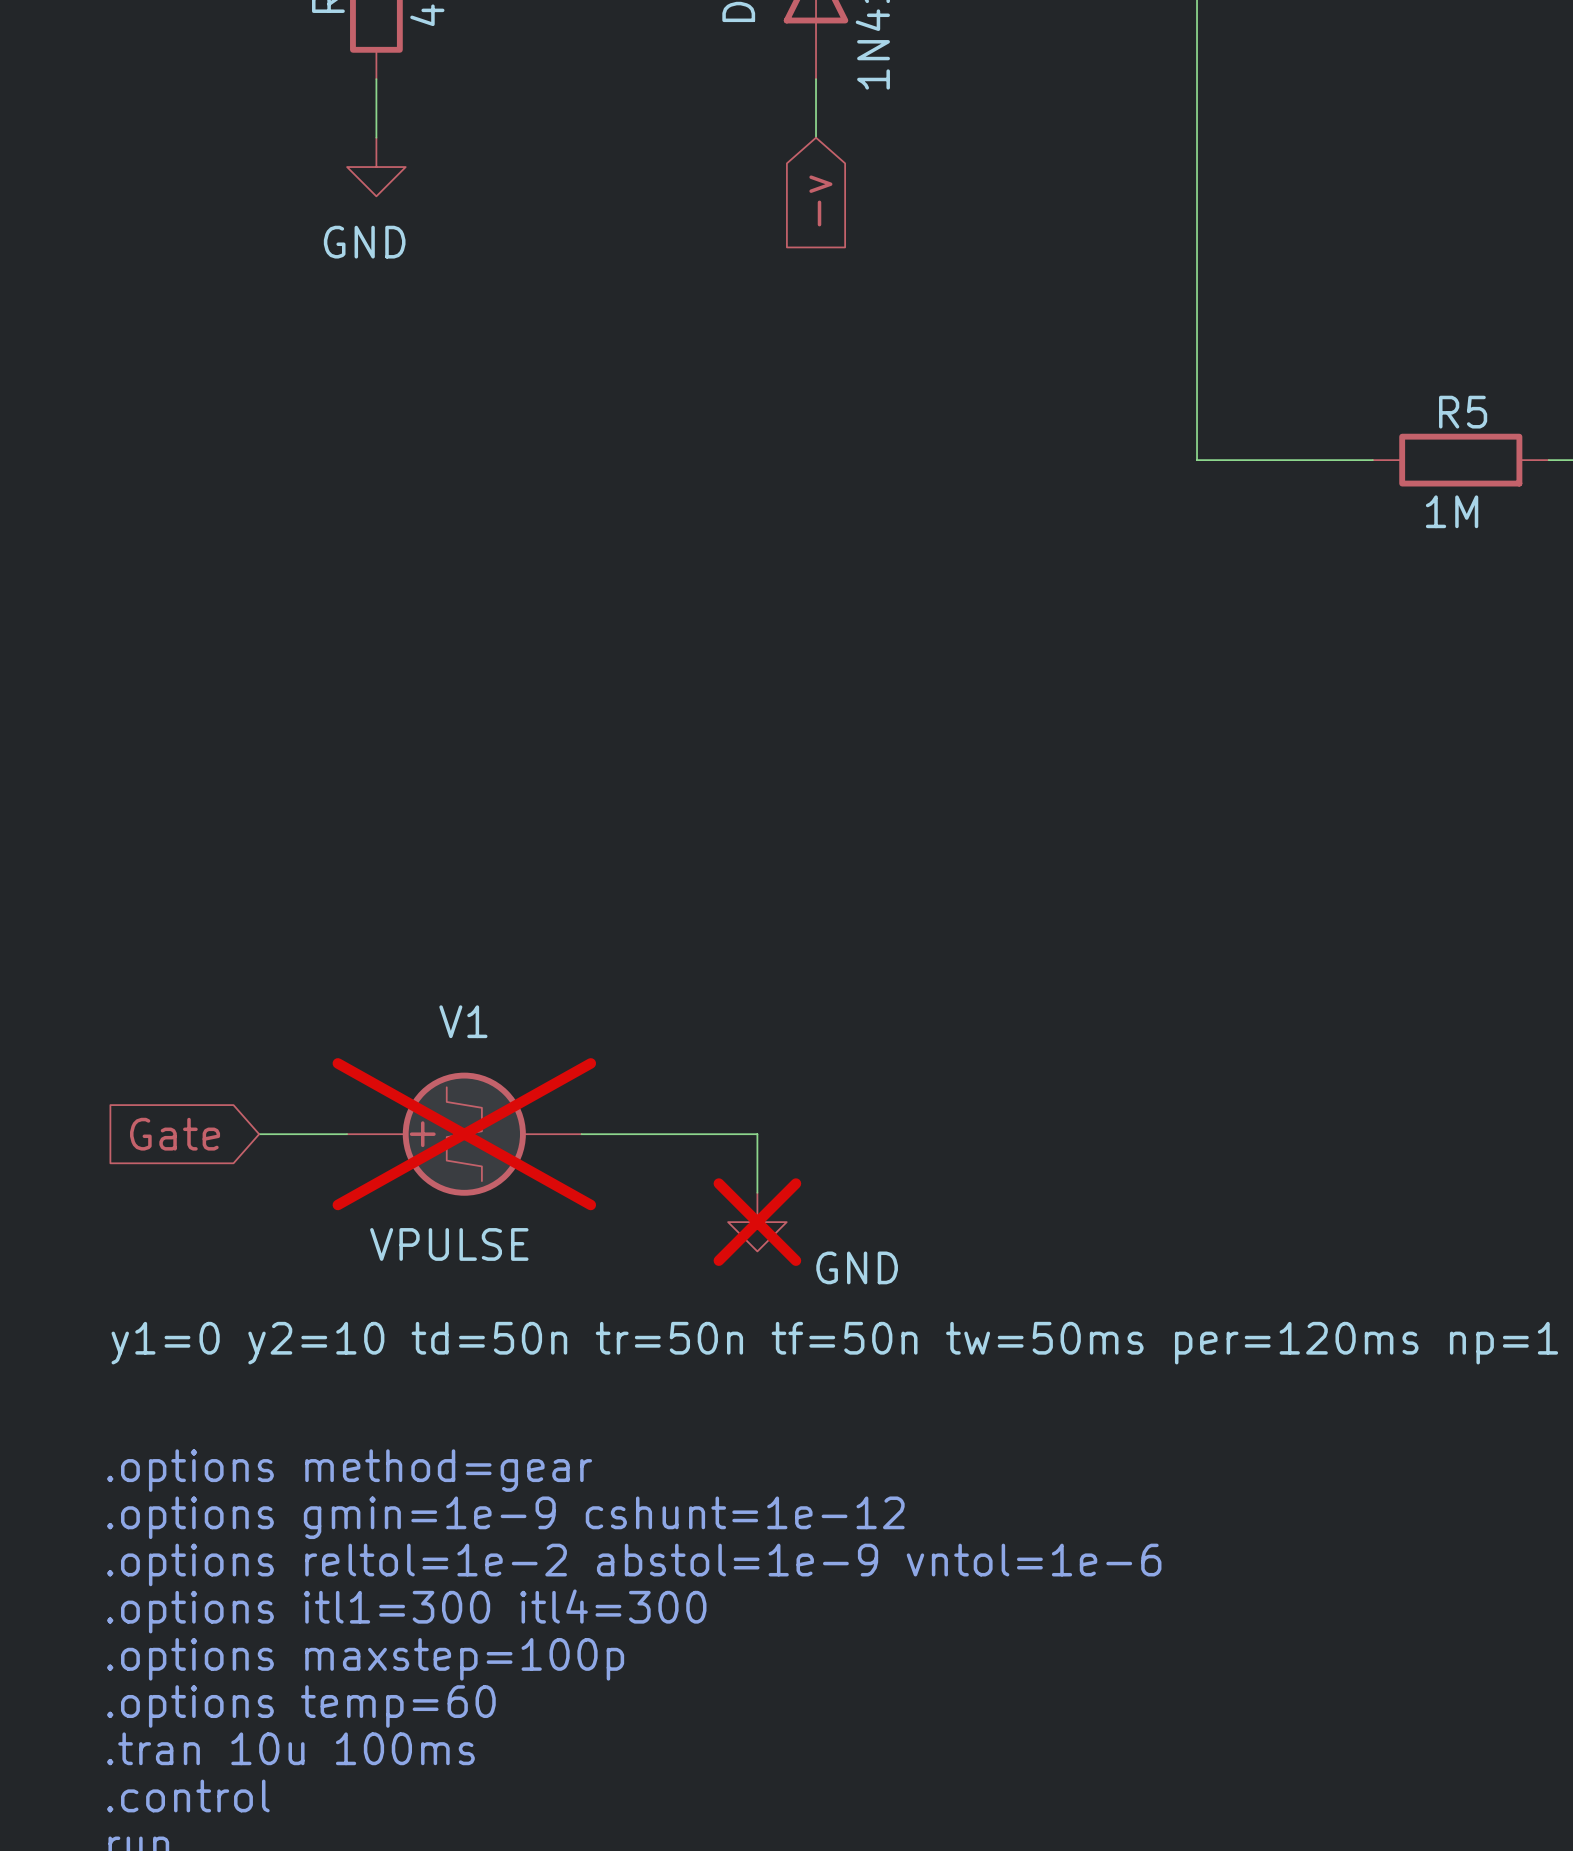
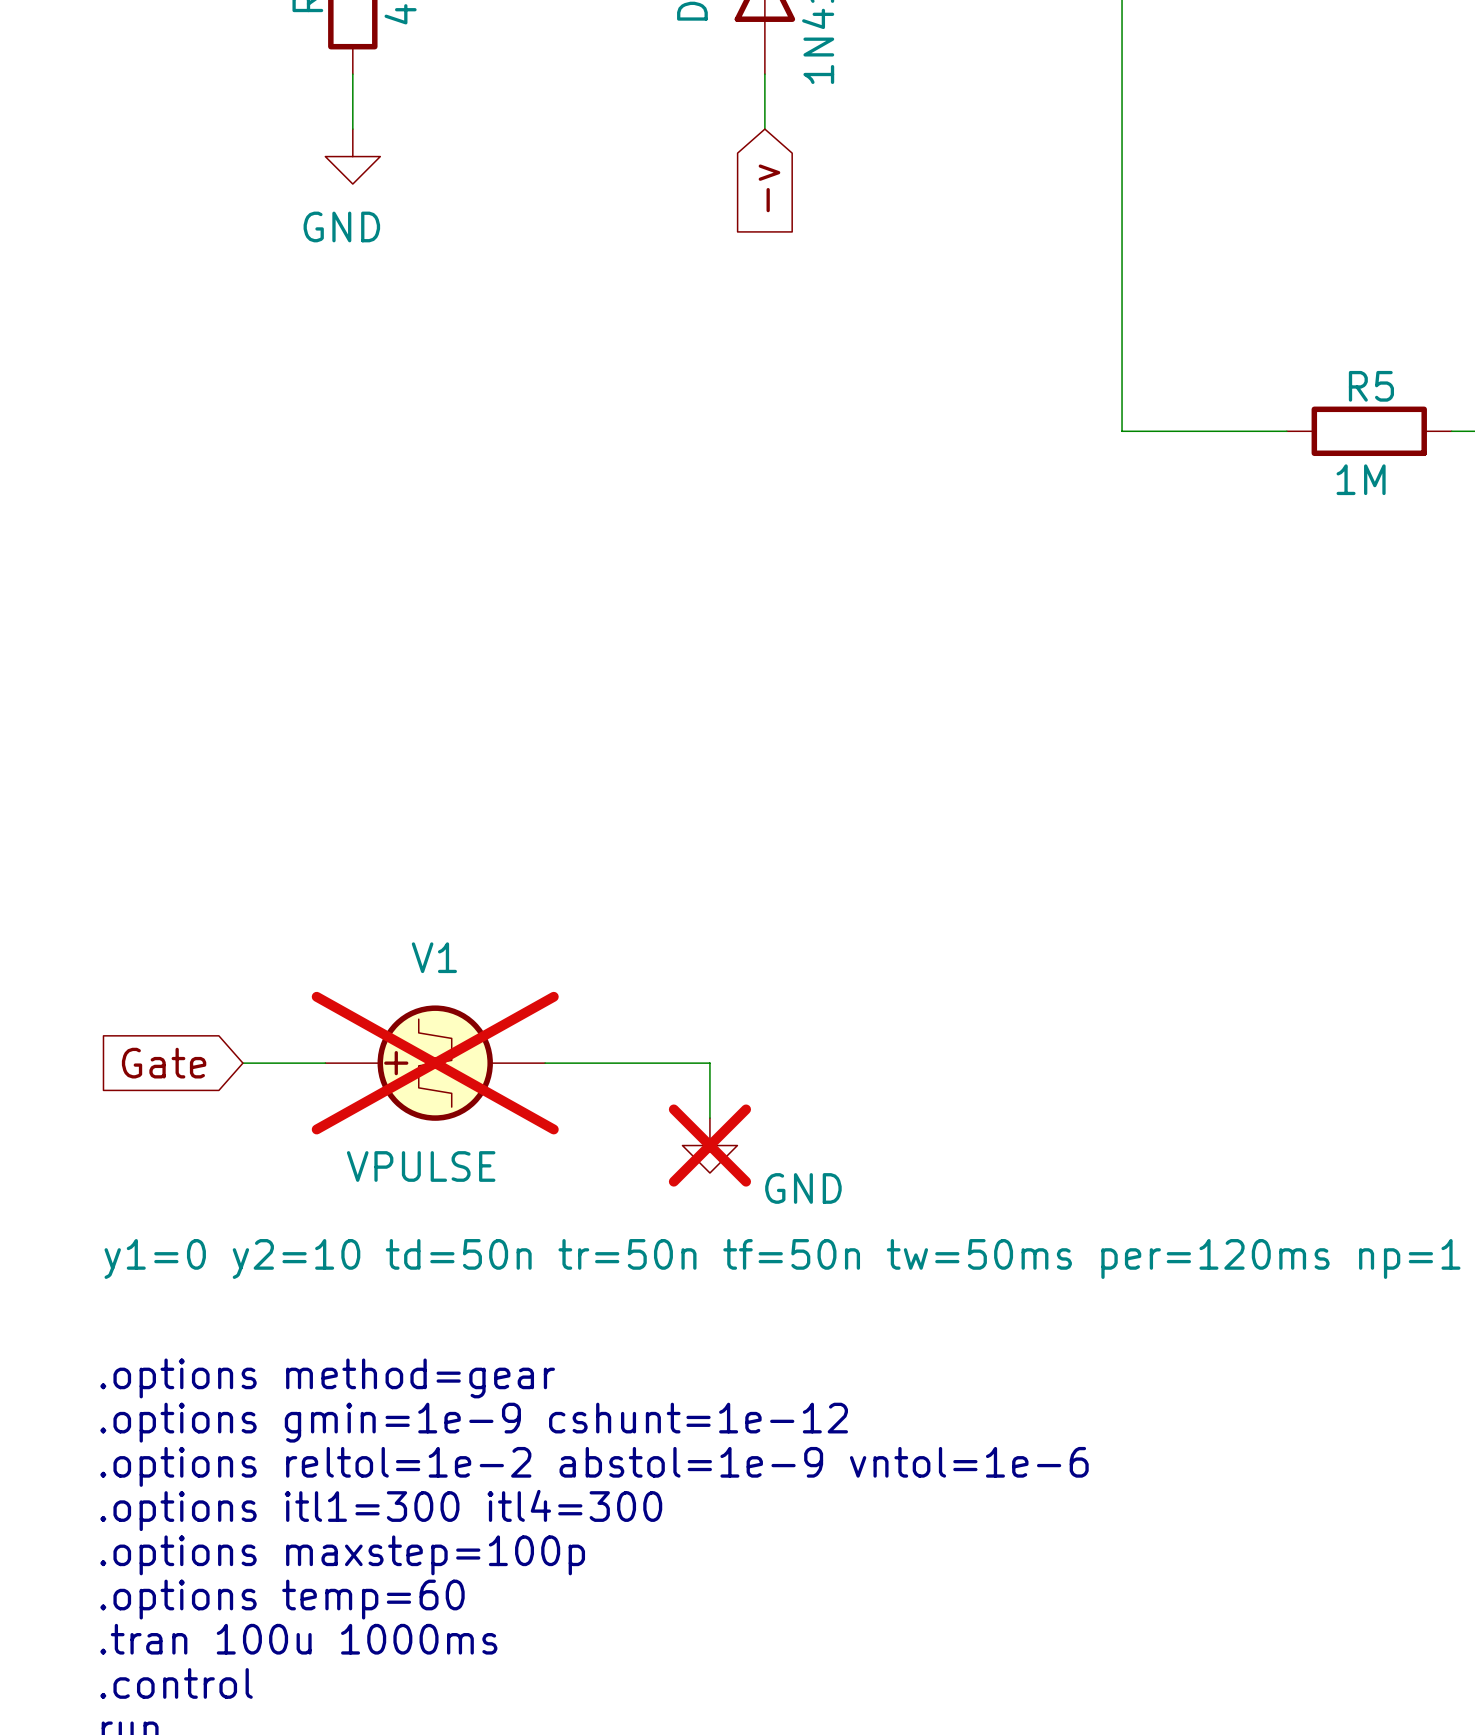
text: .tran 10u 100ms (290, 1748) -> .tran 100u 1000ms (298, 1639)

